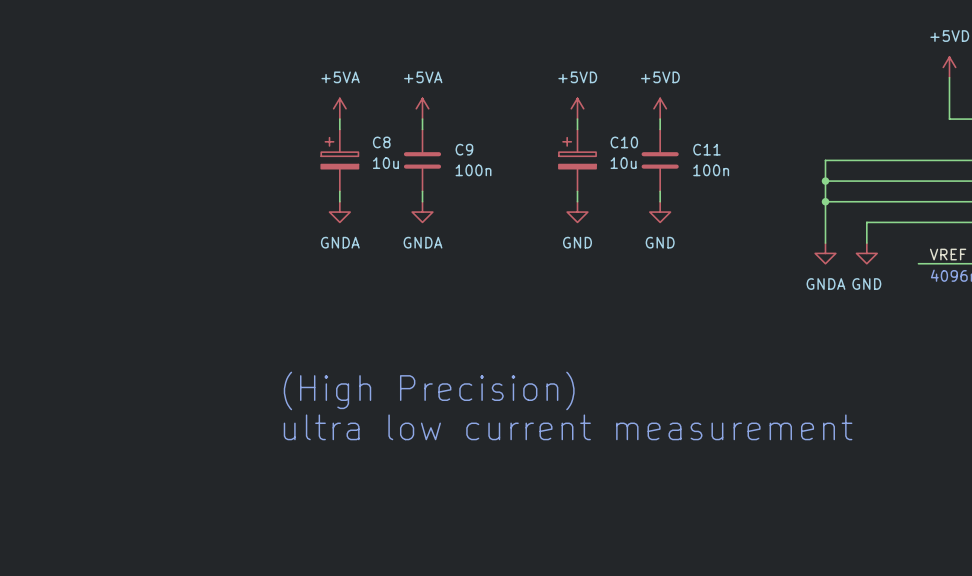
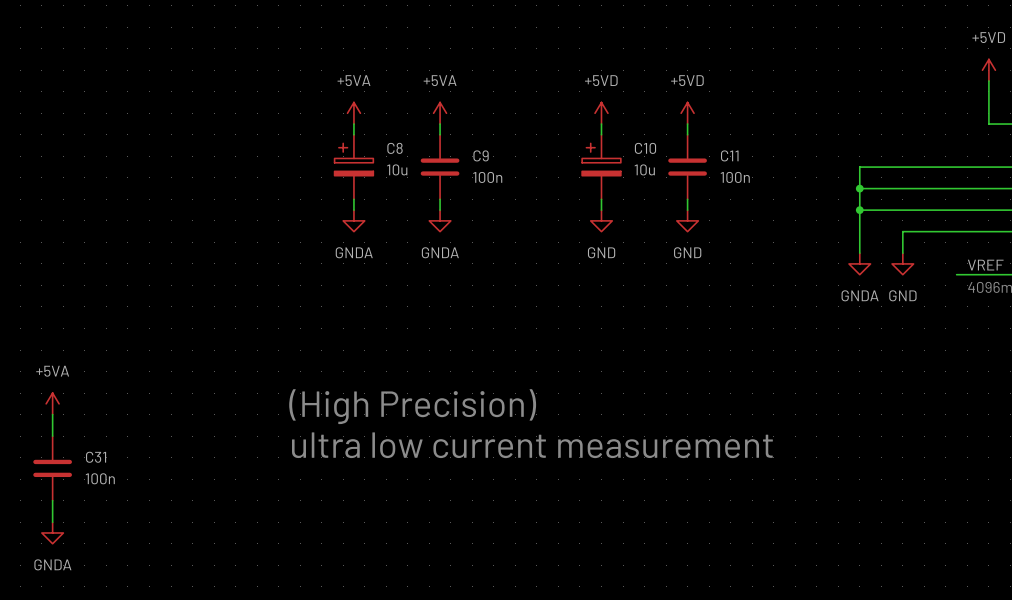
power symbol: none -> +5VA (52, 403)
wire: none -> (52, 414) (52, 436)
C31: none -> 100n (52, 468)
wire: none -> (52, 500) (52, 522)
power symbol: none -> GNDA (52, 532)

